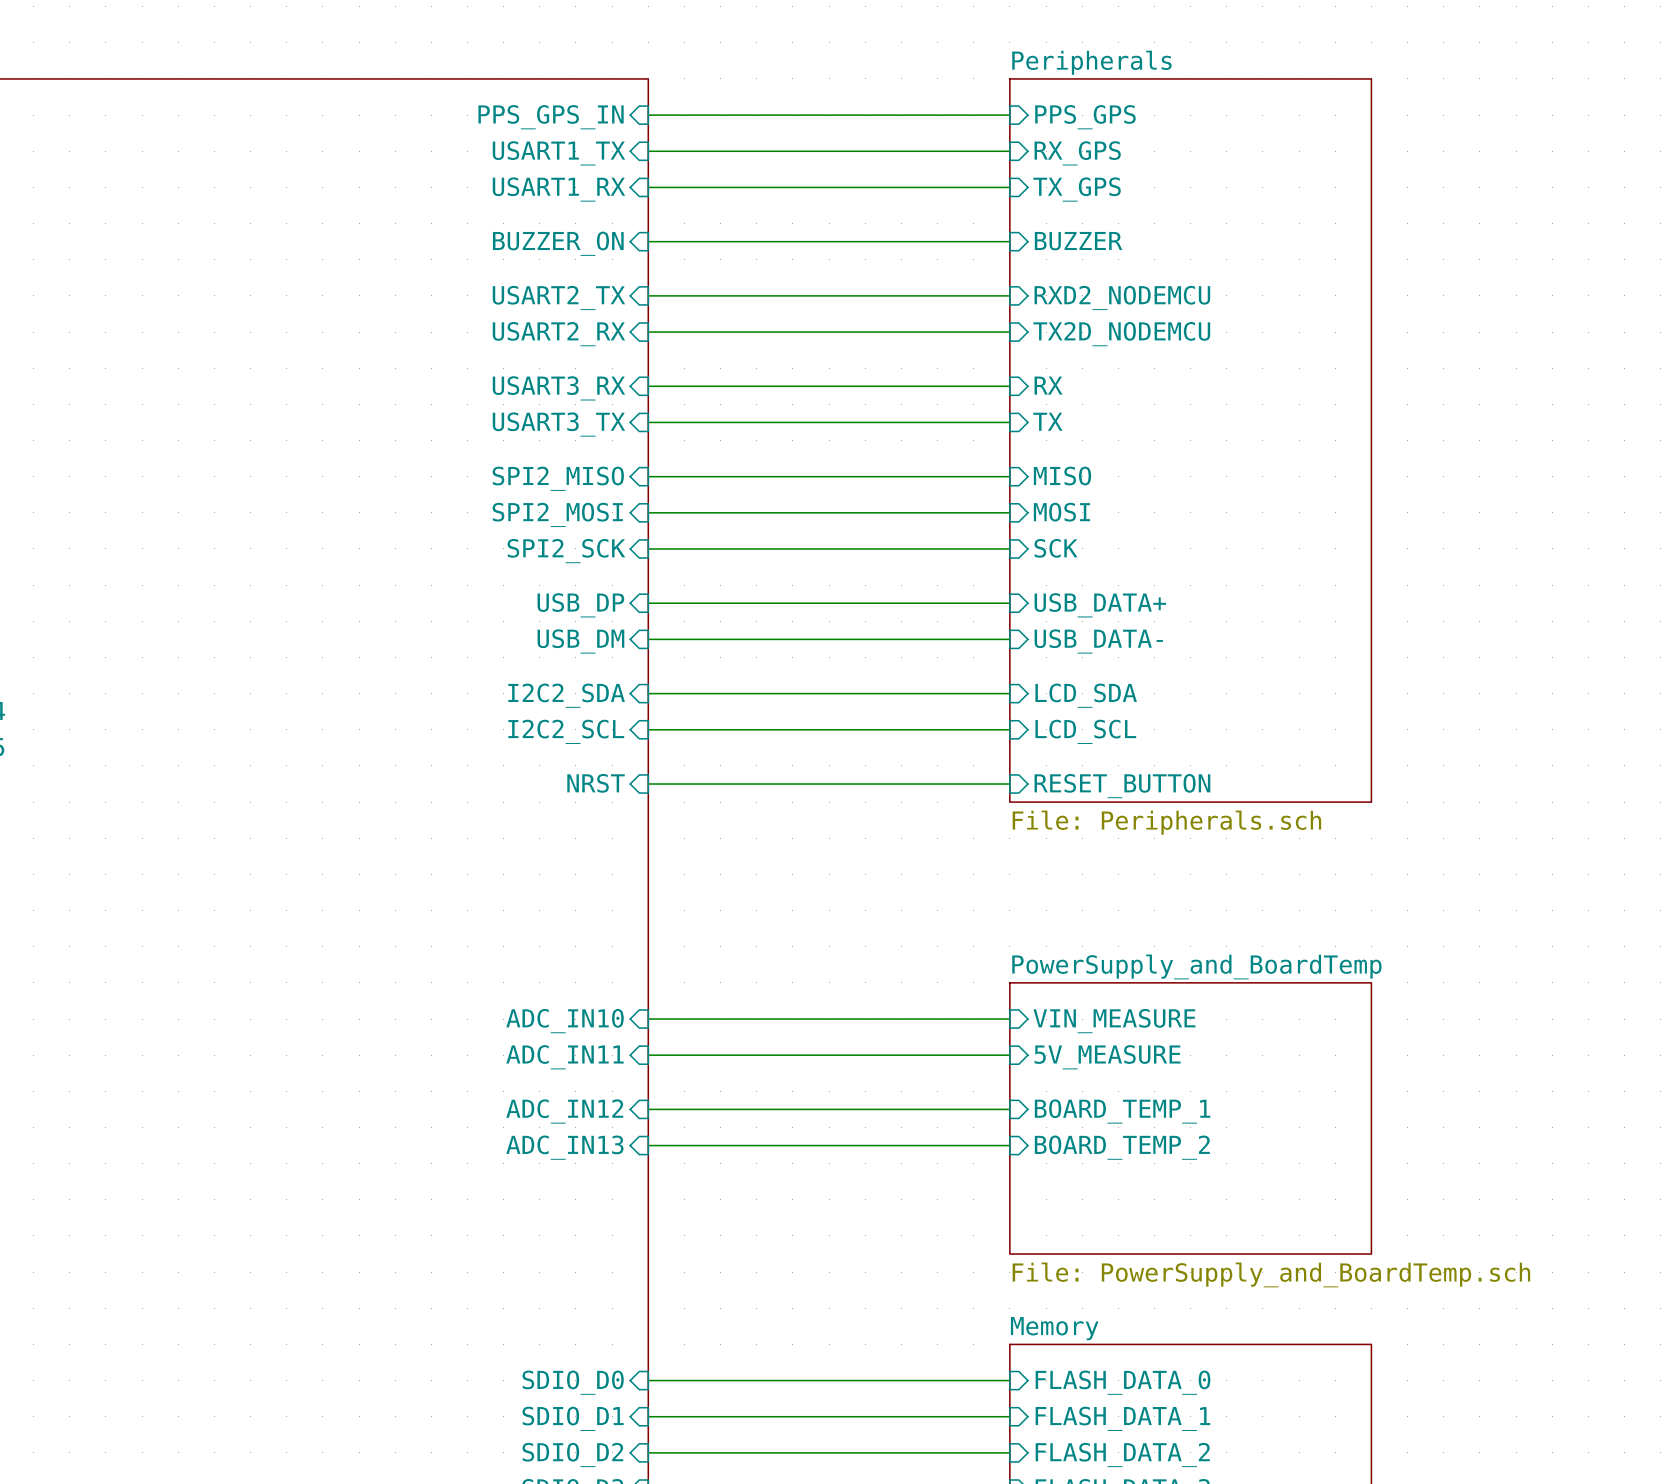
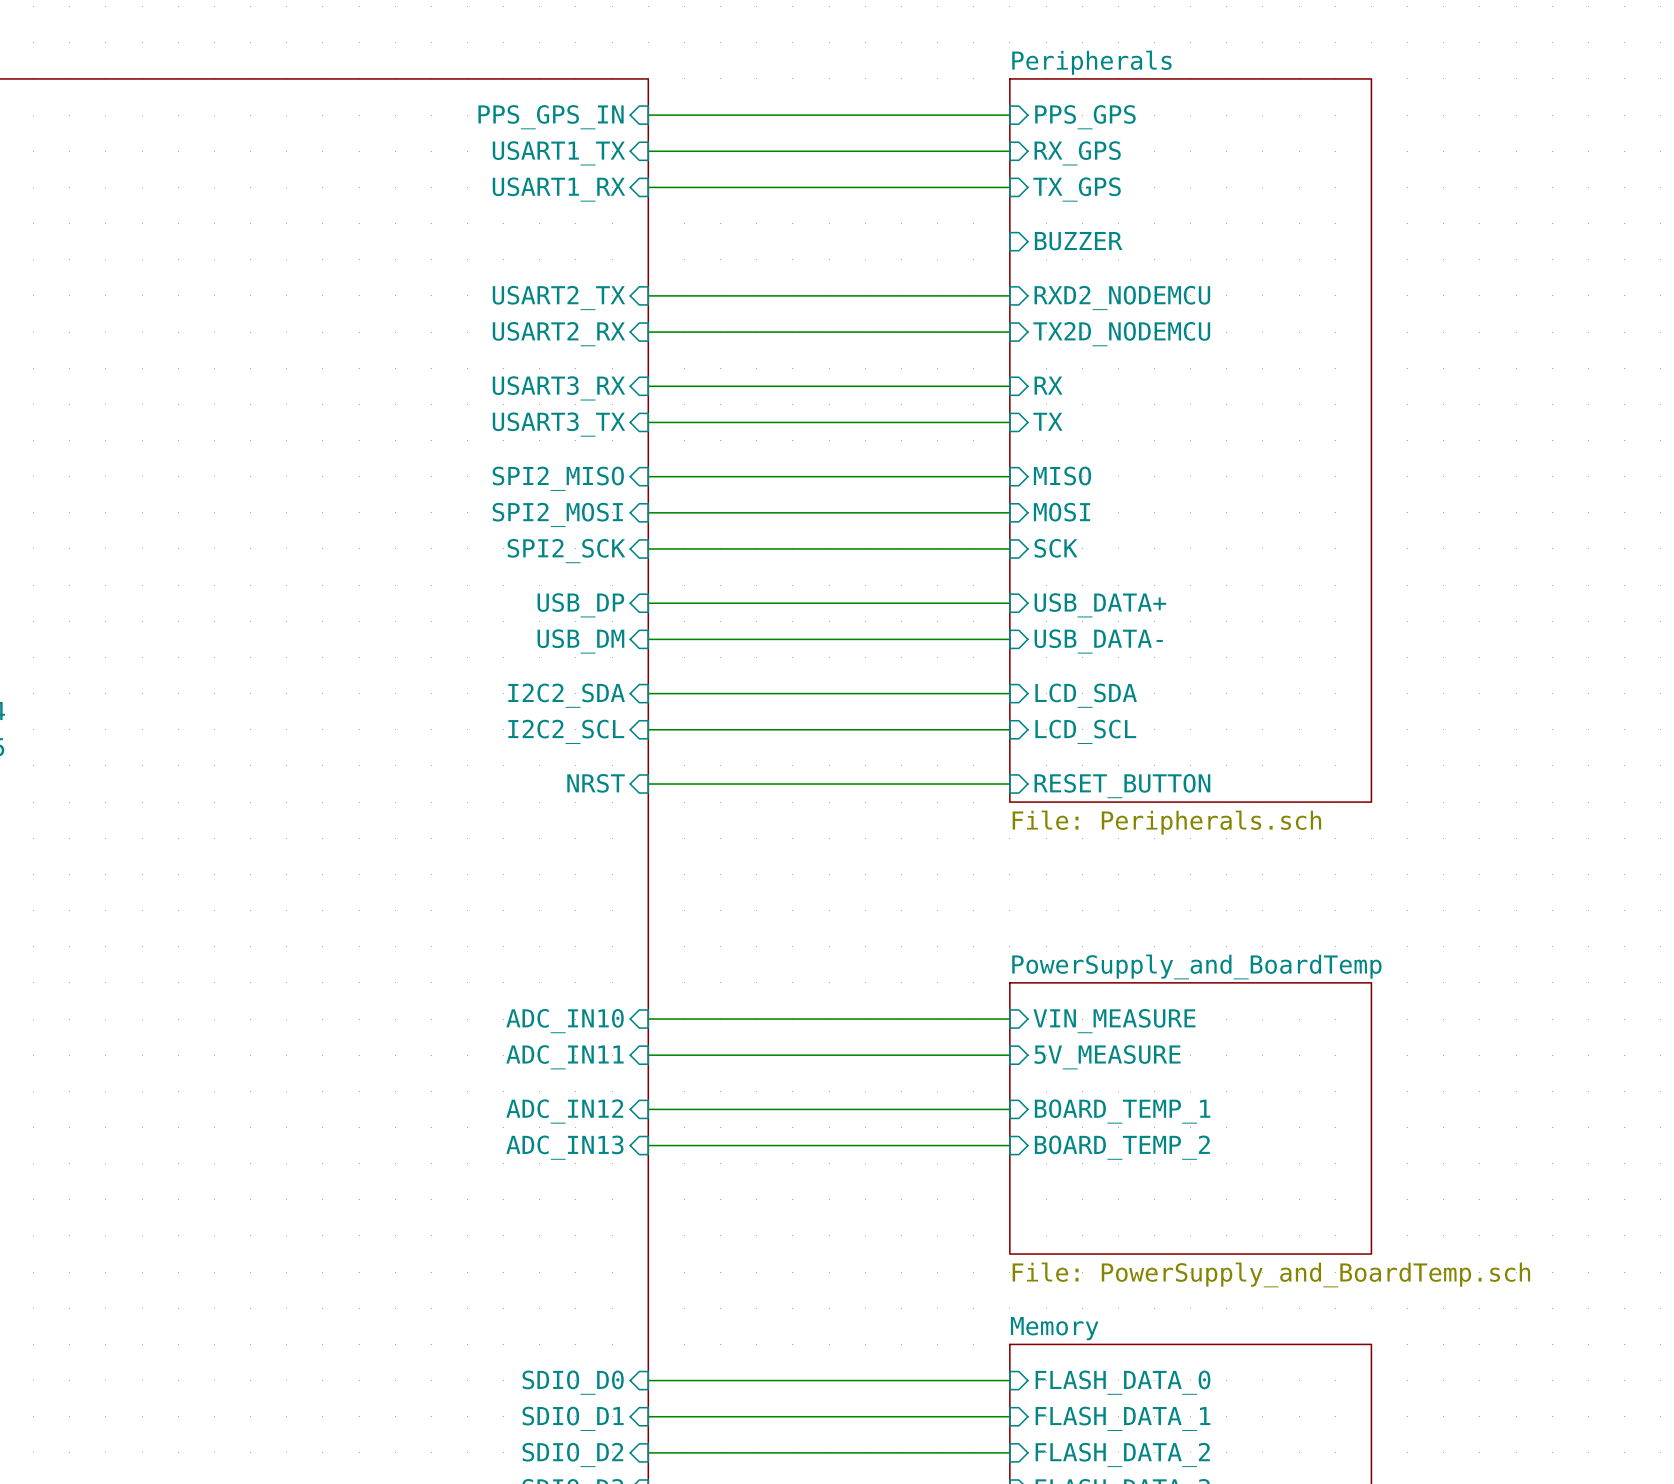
wire: (648, 241) (1009, 241) -> none
sheet pin: BUZZER_ON (558, 243) -> none

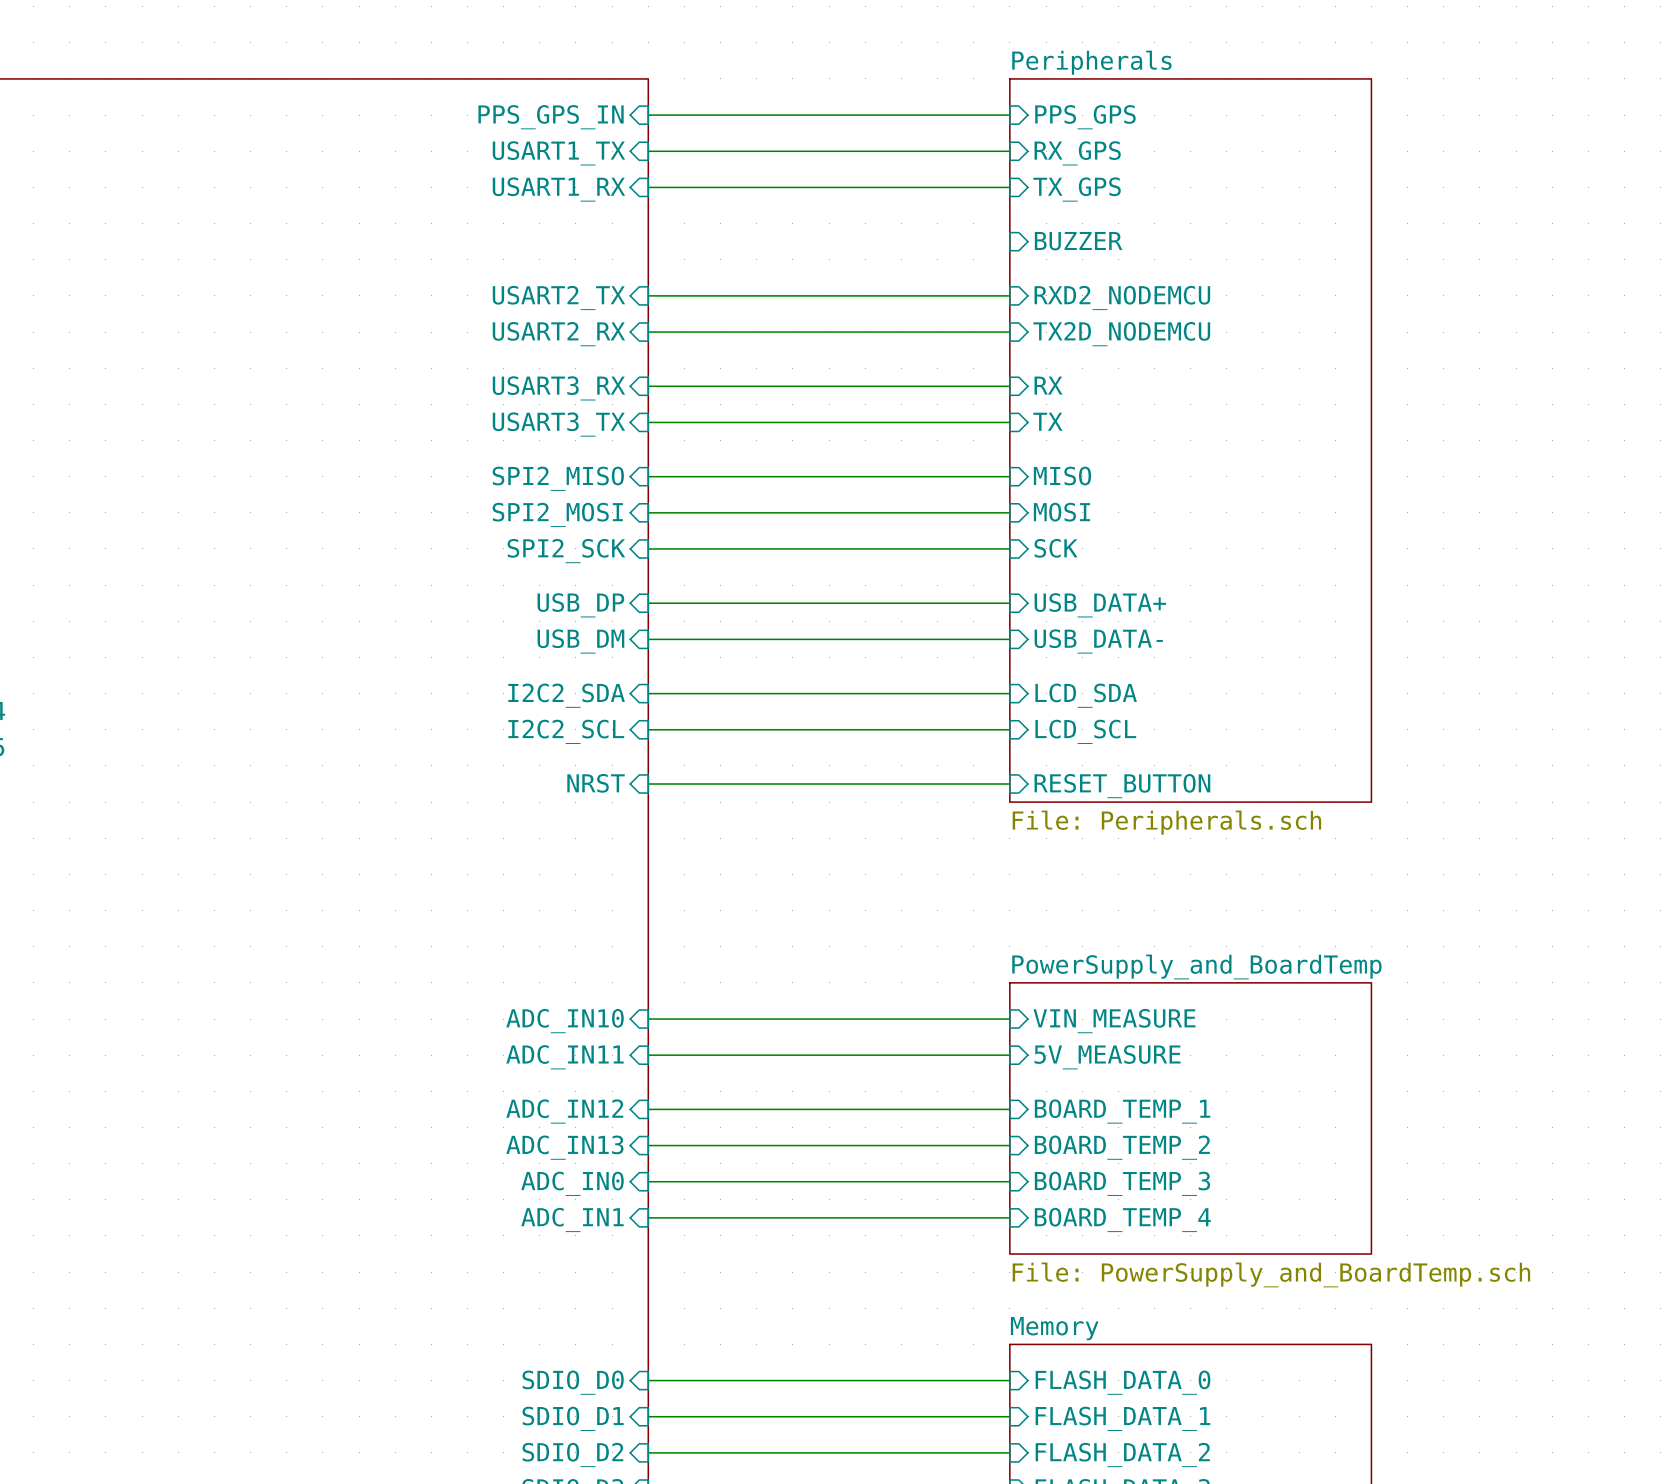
wire: none -> (648, 1181) (1009, 1181)
sheet pin: none -> ADC_IN0 (572, 1183)
sheet pin: none -> BOARD_TEMP_3 (1122, 1183)
wire: none -> (648, 1217) (1009, 1217)
sheet pin: none -> ADC_IN1 (572, 1219)
sheet pin: none -> BOARD_TEMP_4 (1122, 1219)

